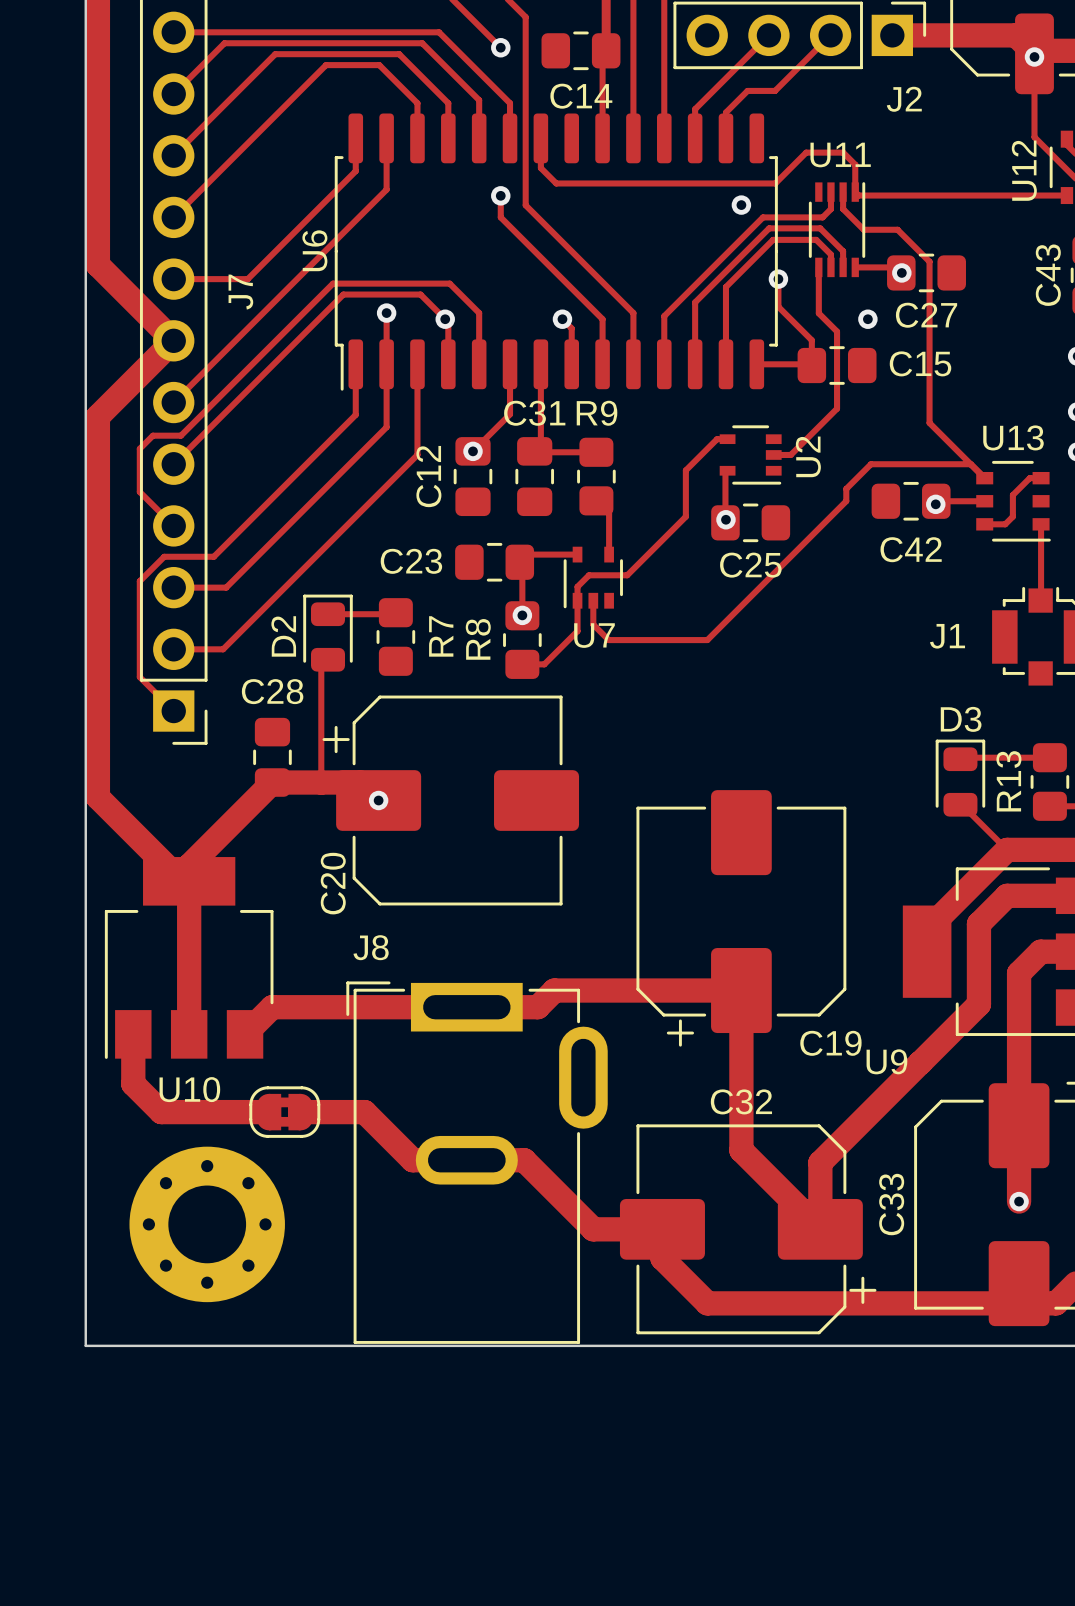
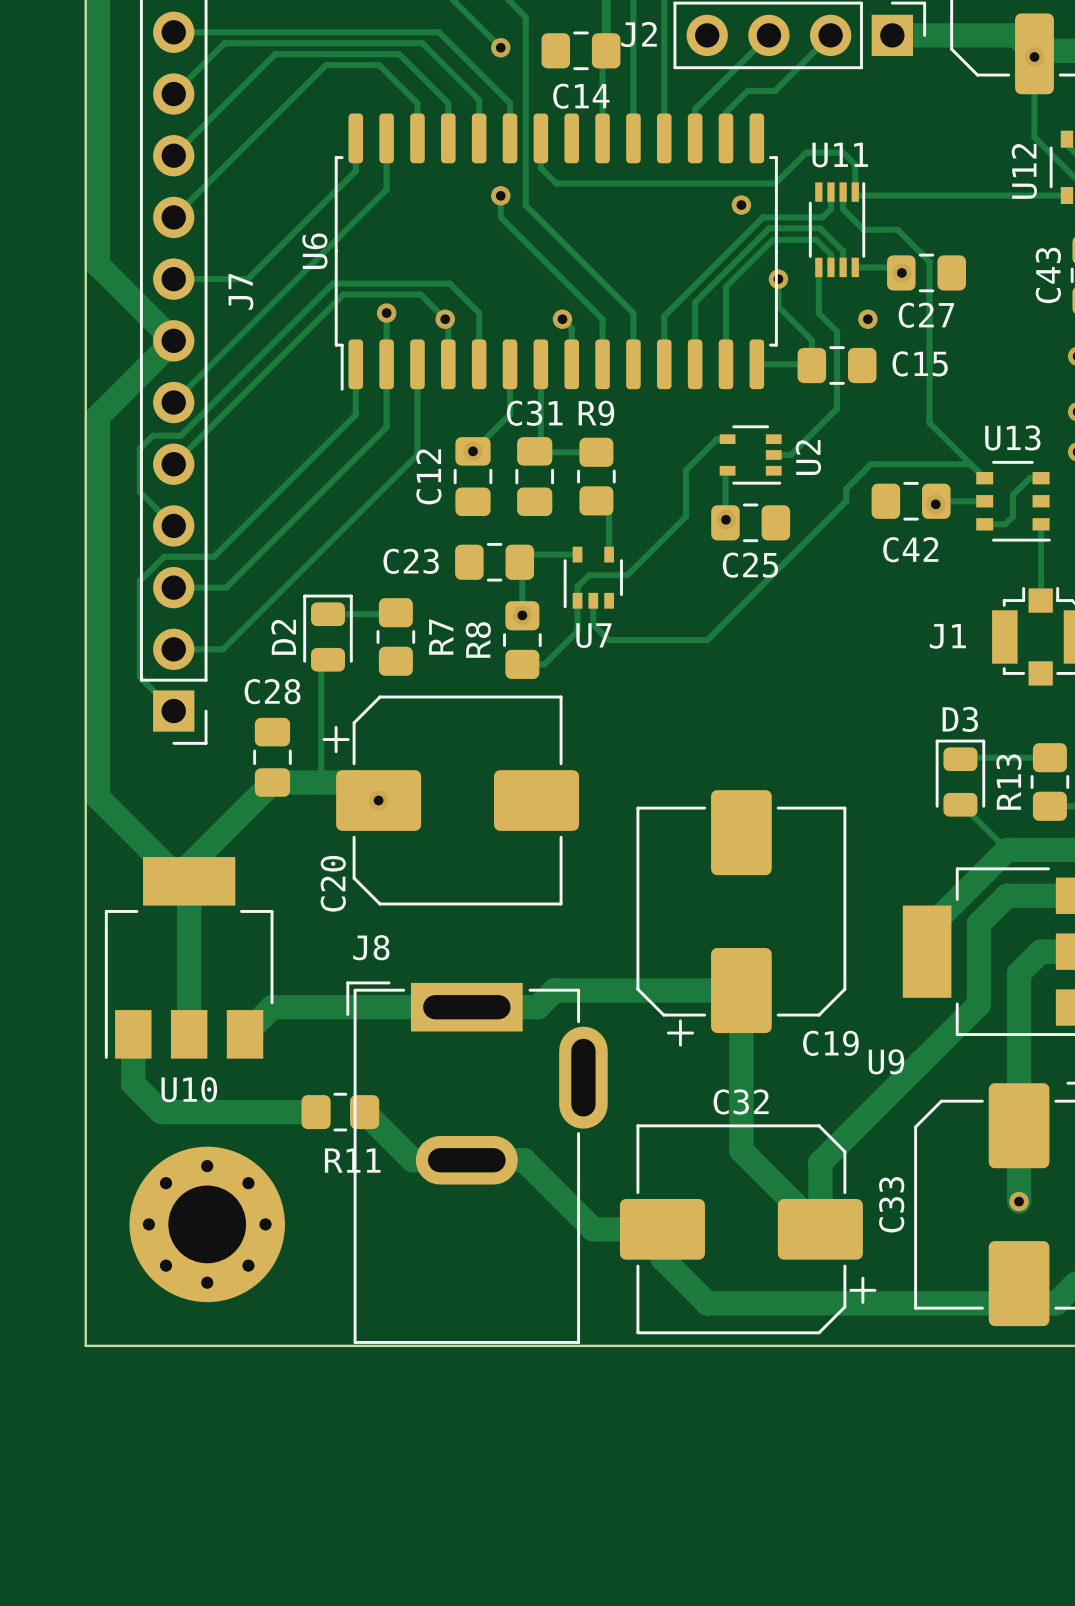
J2 name position: J2 (904, 99) -> J2 (639, 34)
part: (284, 1112) -> none
track: (316, 1112) (364, 1112) -> (260, 1112) (309, 1112)
R11: none -> (340, 1112)

